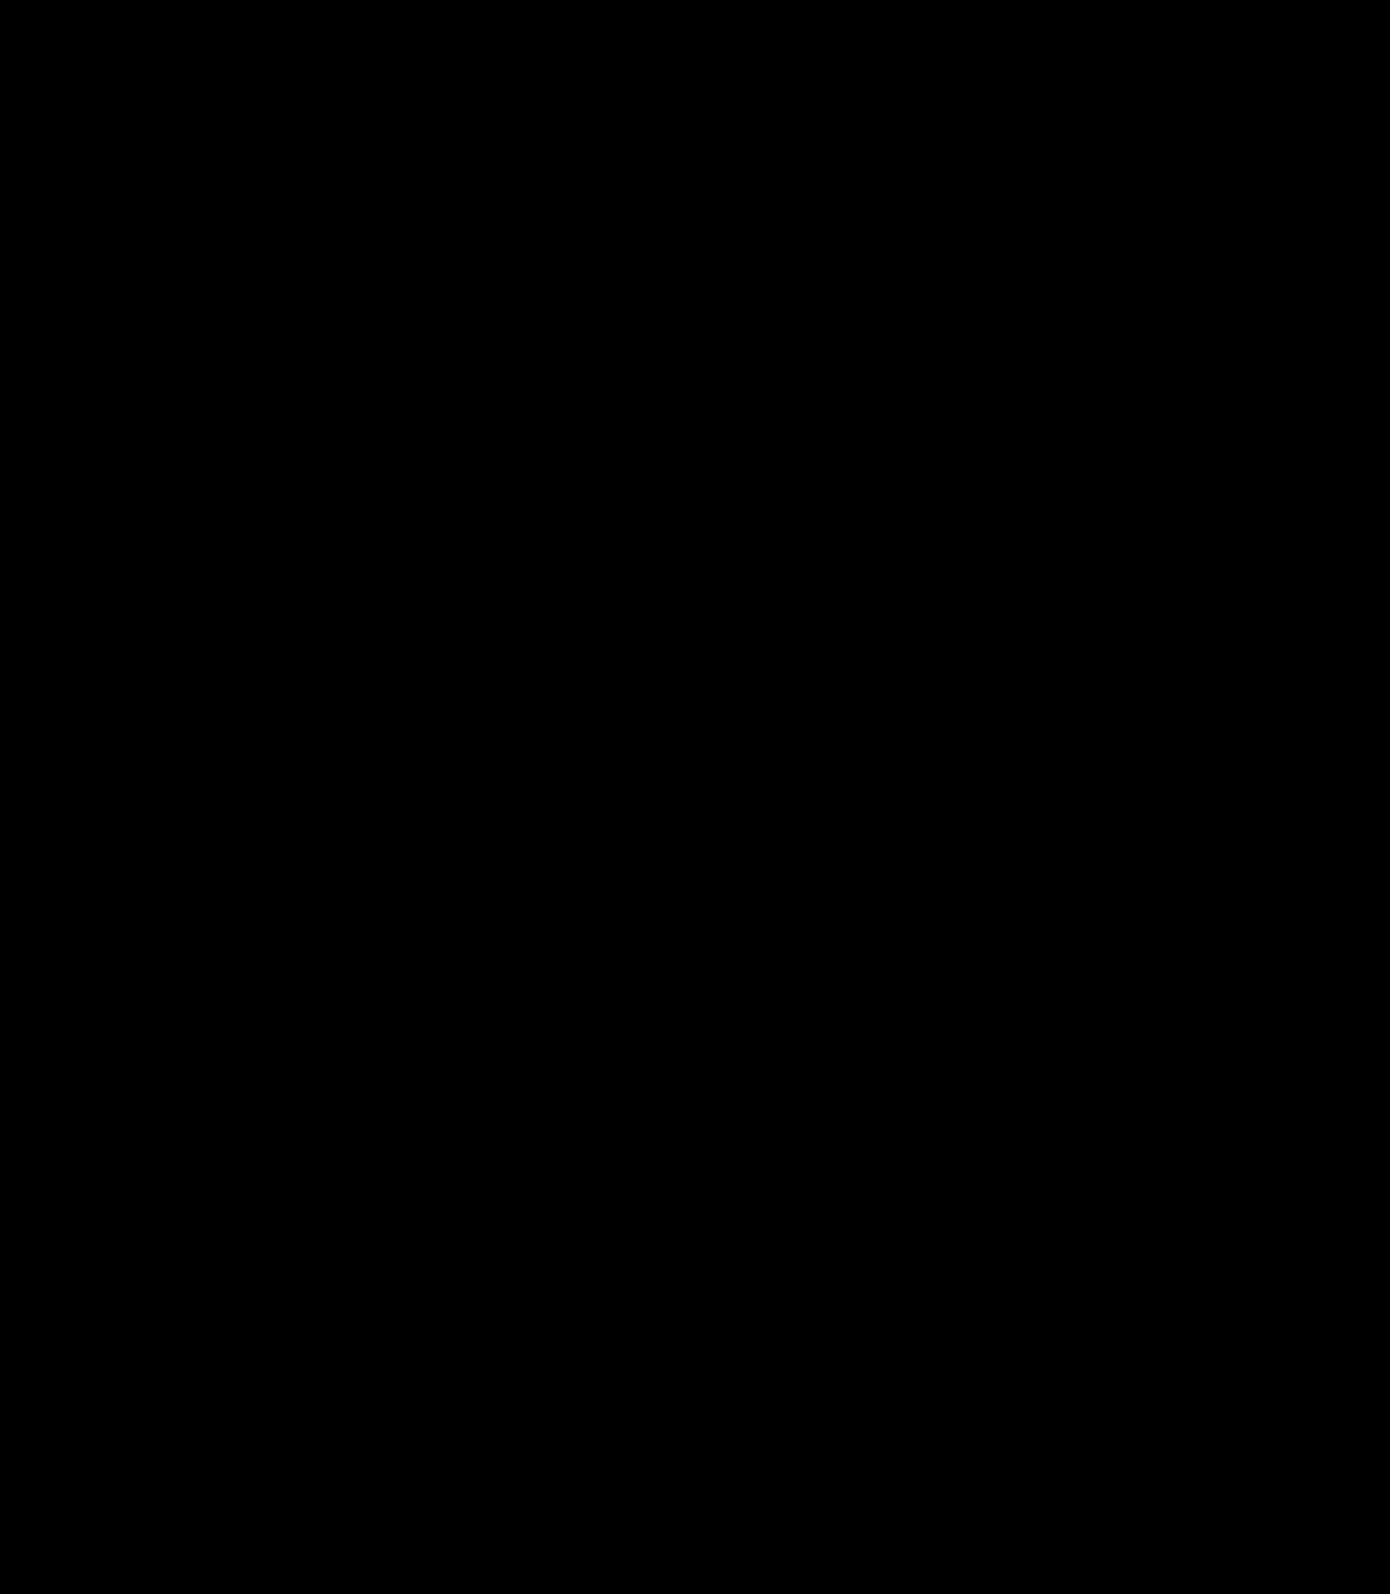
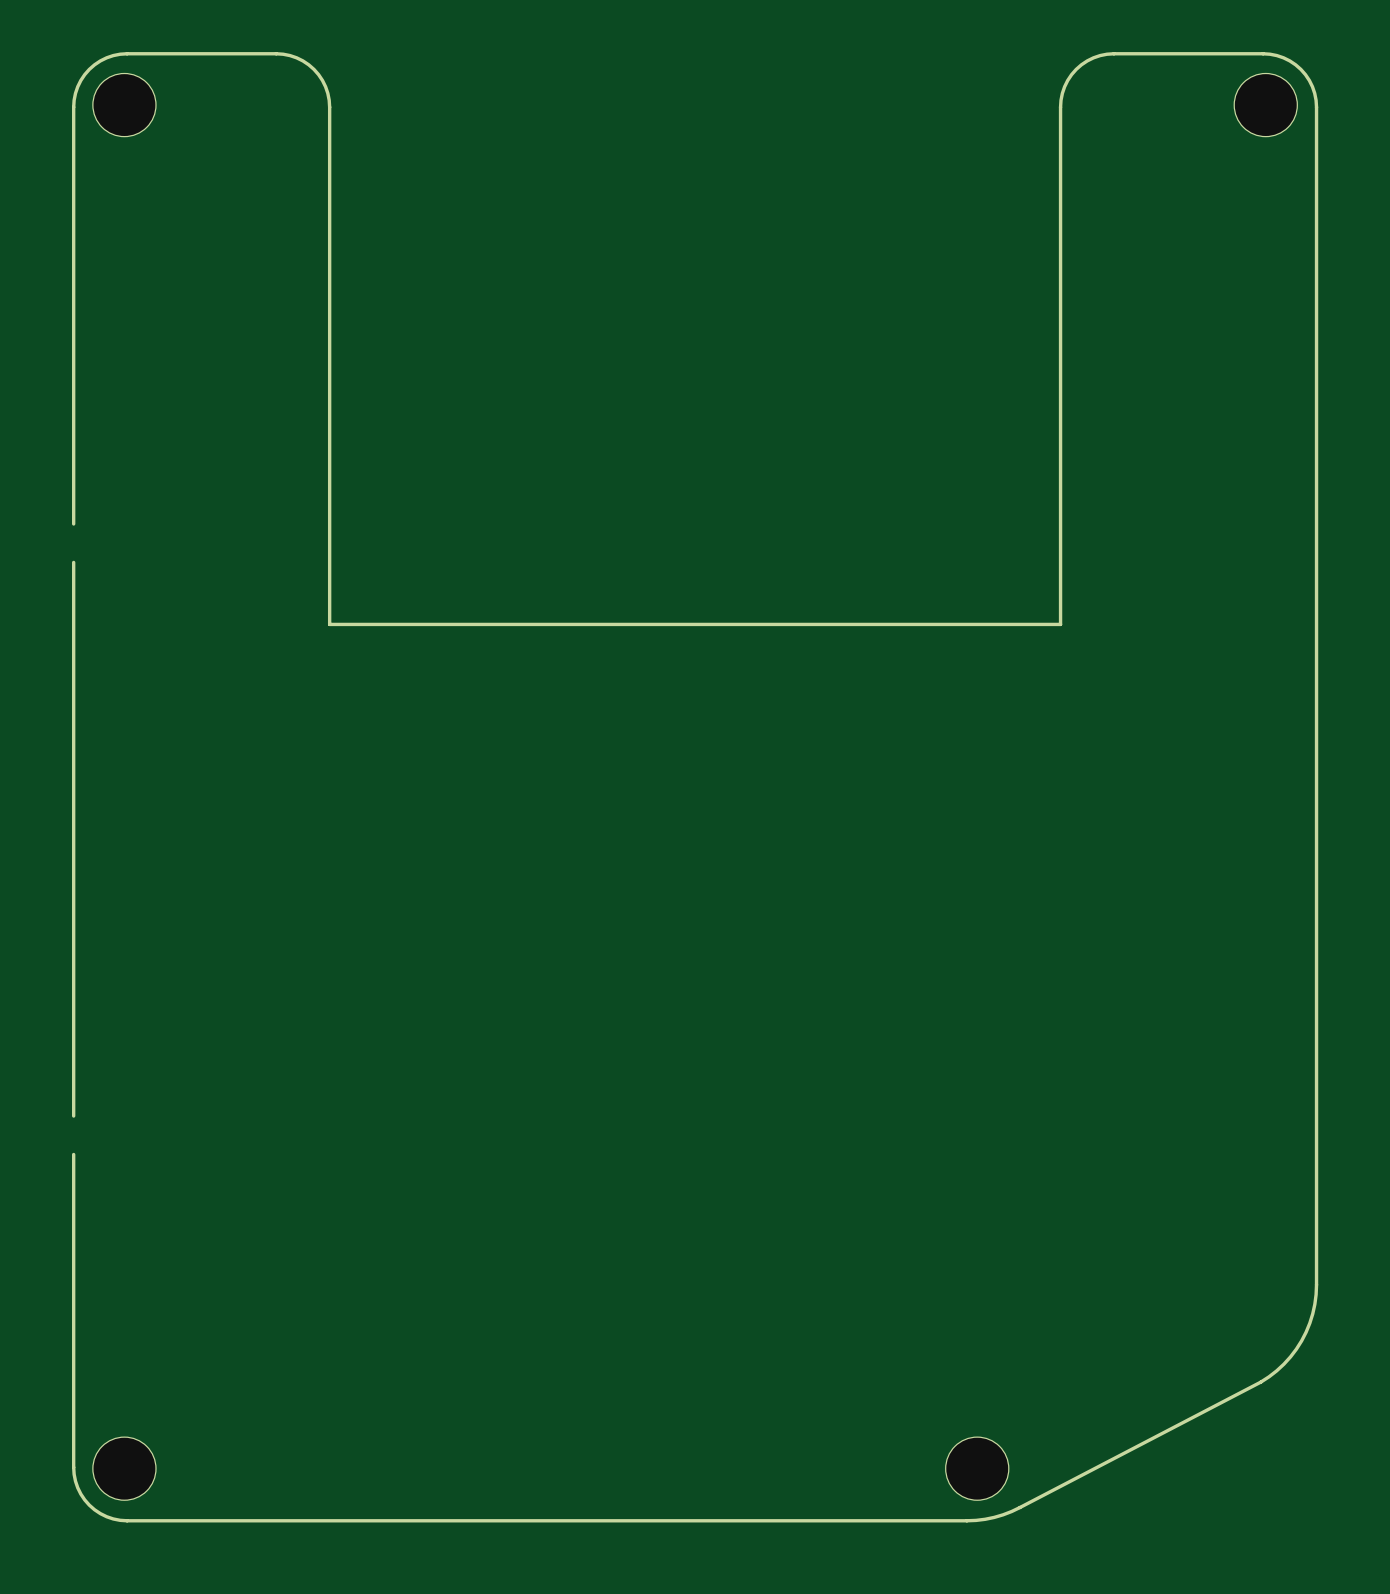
part: none -> (124, 105)
part: none -> (1265, 105)
board edge: none -> (73, 523) (74, 100) (77, 86) (84, 74) (94, 64) (106, 57) (127, 53) (283, 54) (296, 57) (308, 64) (318, 74) (325, 86) (329, 107) (329, 624) (1060, 624) (1060, 107) (1064, 86) (1071, 74) (1081, 64) (1100, 55) (1113, 53) (1270, 54) (1283, 57) (1295, 64) (1305, 74) (1312, 86) (1316, 107) (1316, 1284) (1312, 1313) (1306, 1332) (1296, 1349) (1276, 1370) (1260, 1382) (1019, 1507) (1003, 1514) (985, 1519) (120, 1520) (106, 1516) (89, 1505) (77, 1487) (74, 1474) (73, 1154)
board edge: none -> (73, 562) (73, 1116)
part: none -> (124, 1468)
part: none -> (977, 1468)

